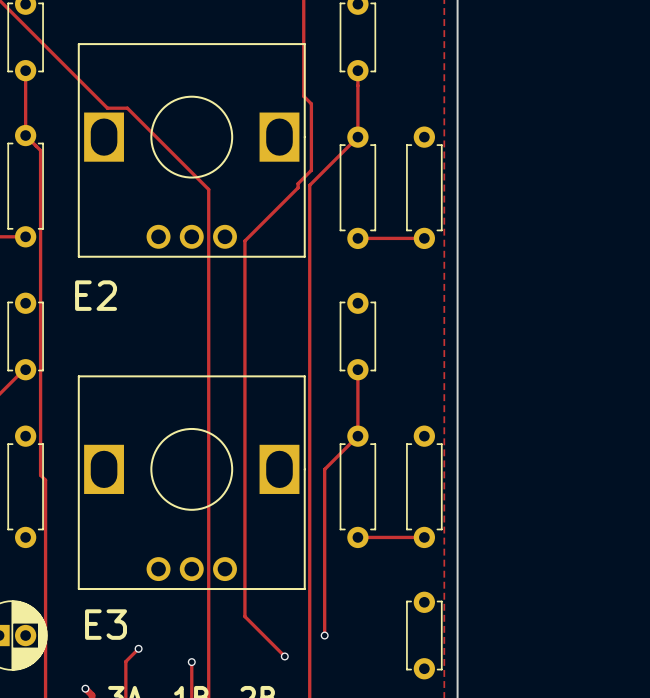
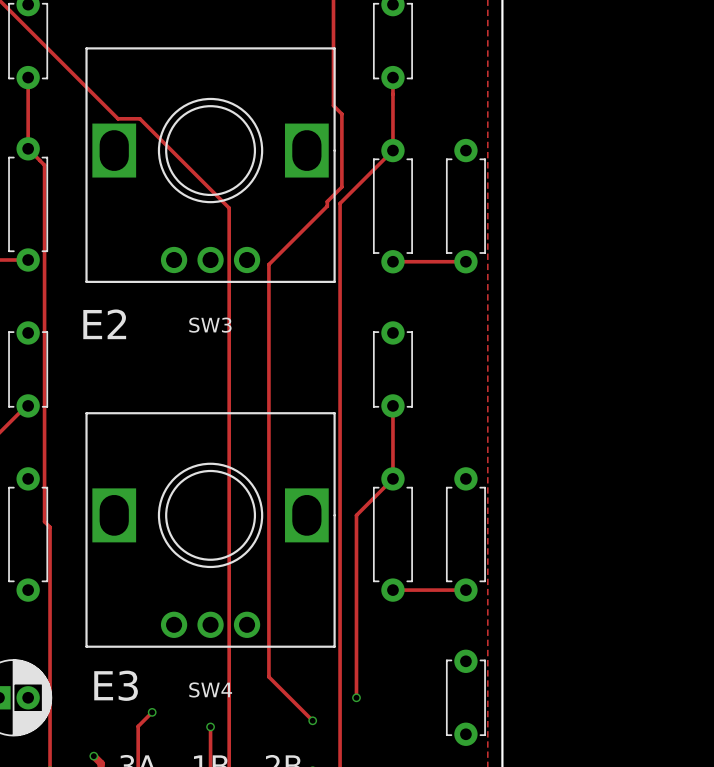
SW3: none -> (210, 165)
SW4: none -> (210, 529)

